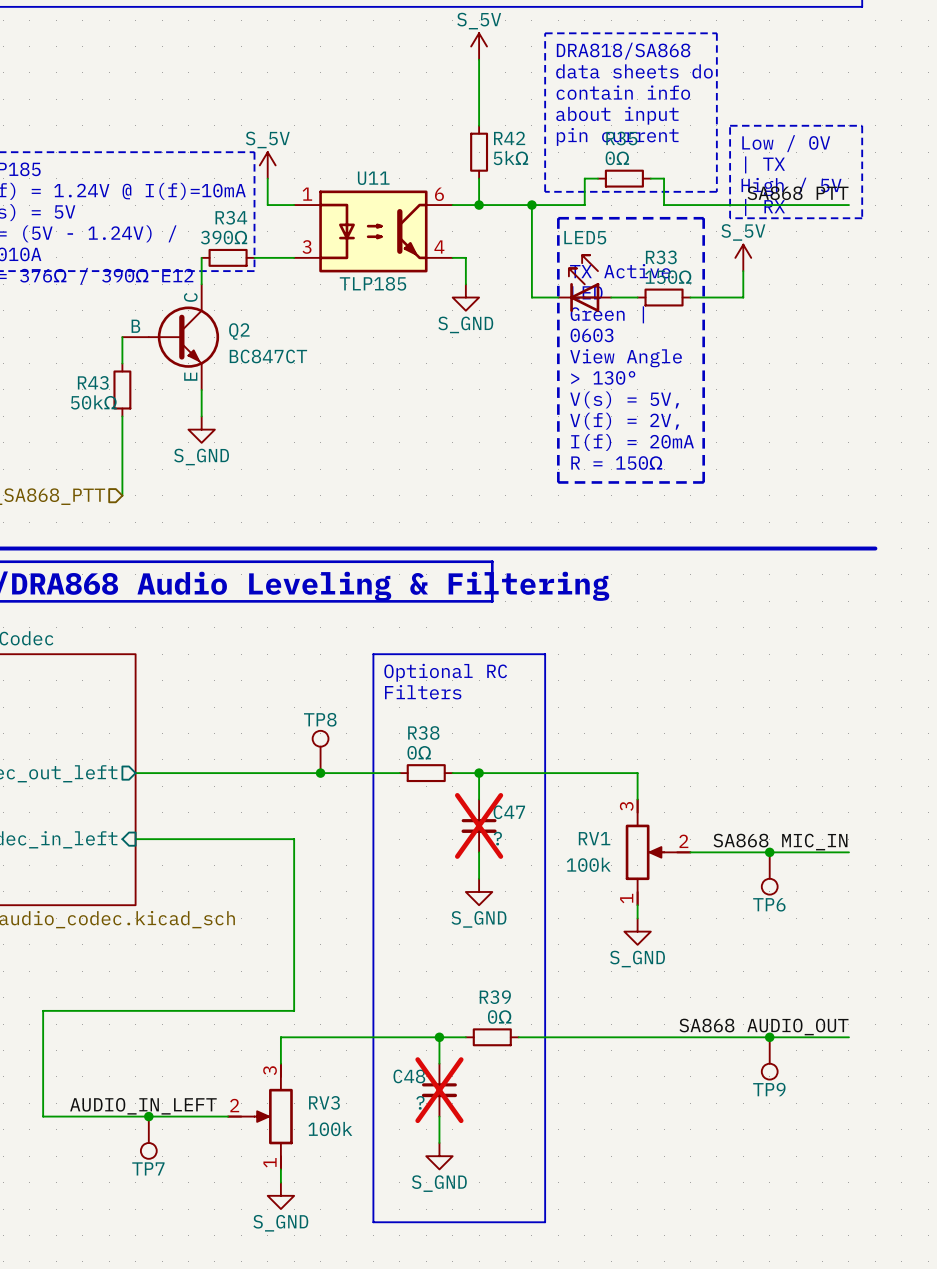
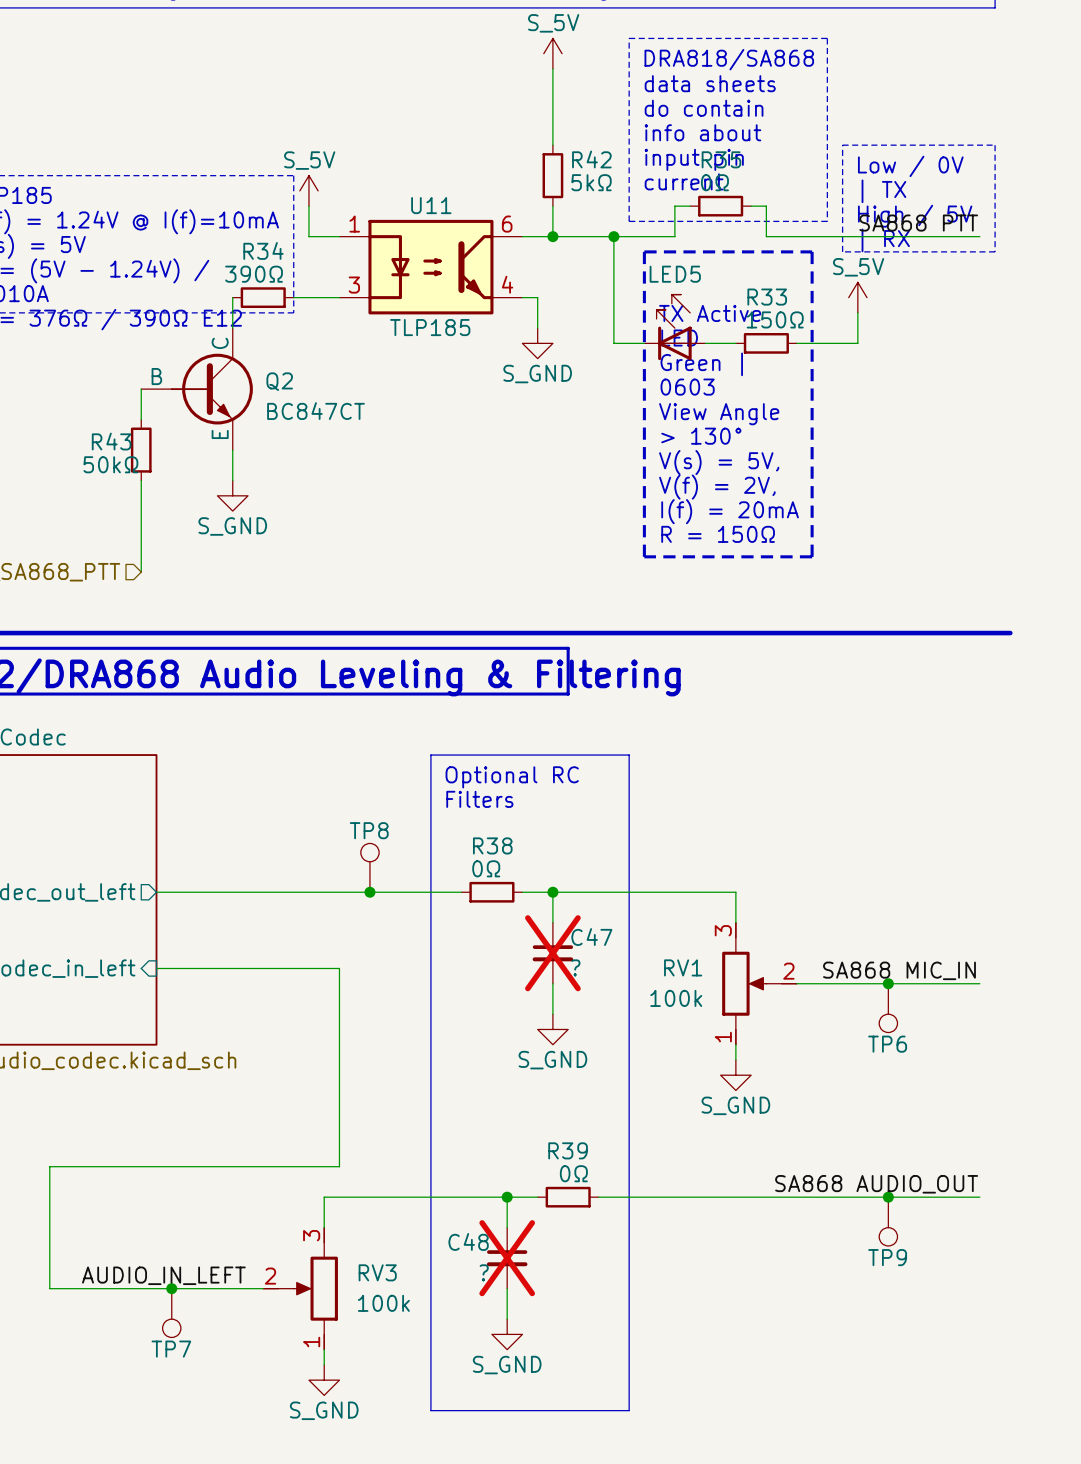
text: data sheets do (634, 71) -> data sheets (710, 83)
text: contain info (623, 92) -> do contain (704, 108)
text: about input (617, 115) -> info about (702, 132)
text: pin current (617, 136) -> input pin (694, 159)
text: none -> current (684, 181)

